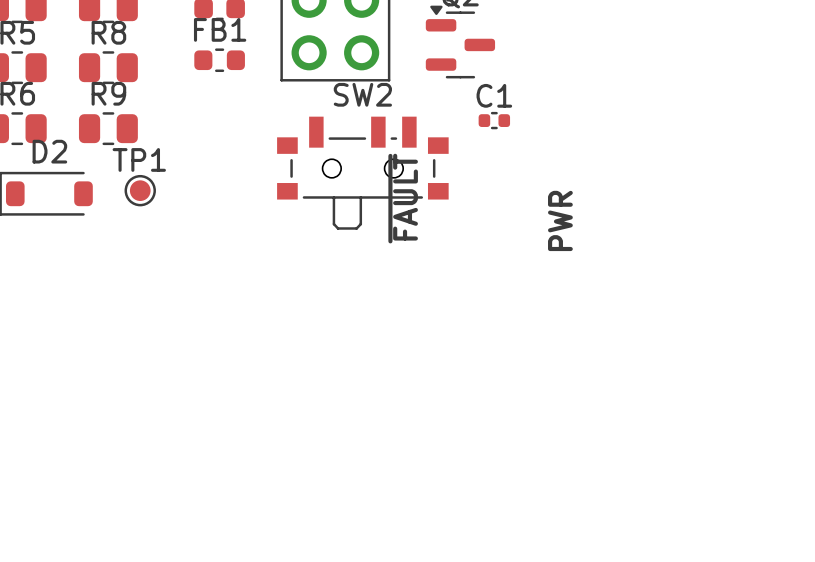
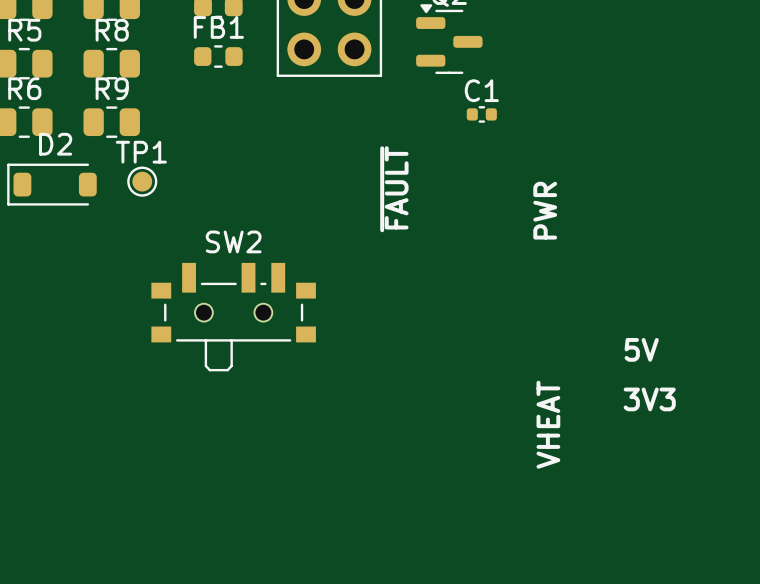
SW2 position: (362, 173) -> (233, 317)
text: none -> 5V (641, 349)
text: none -> 3V3 (649, 399)
text: none -> VHEAT (548, 424)

